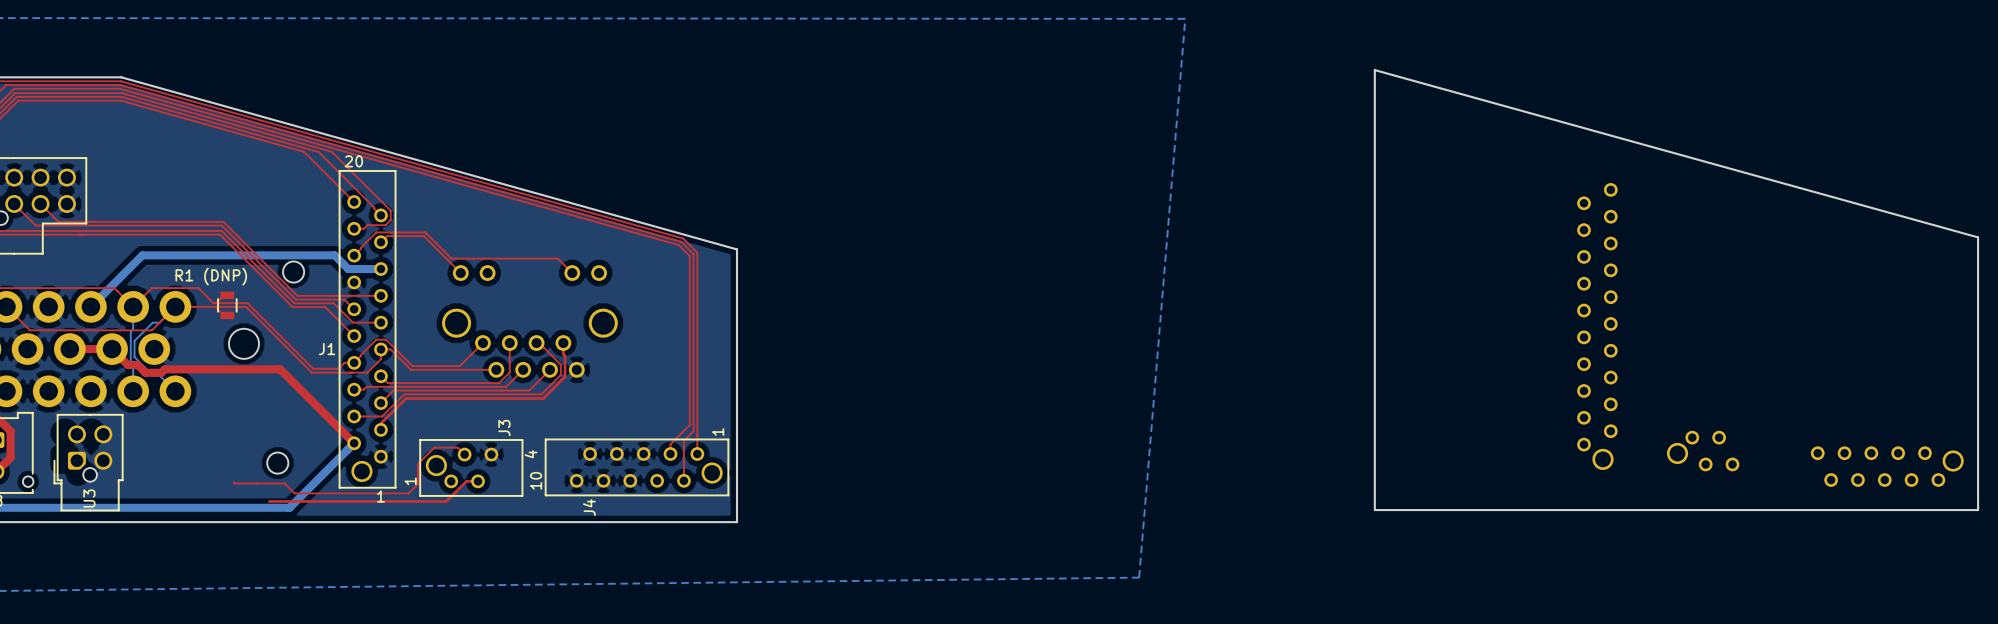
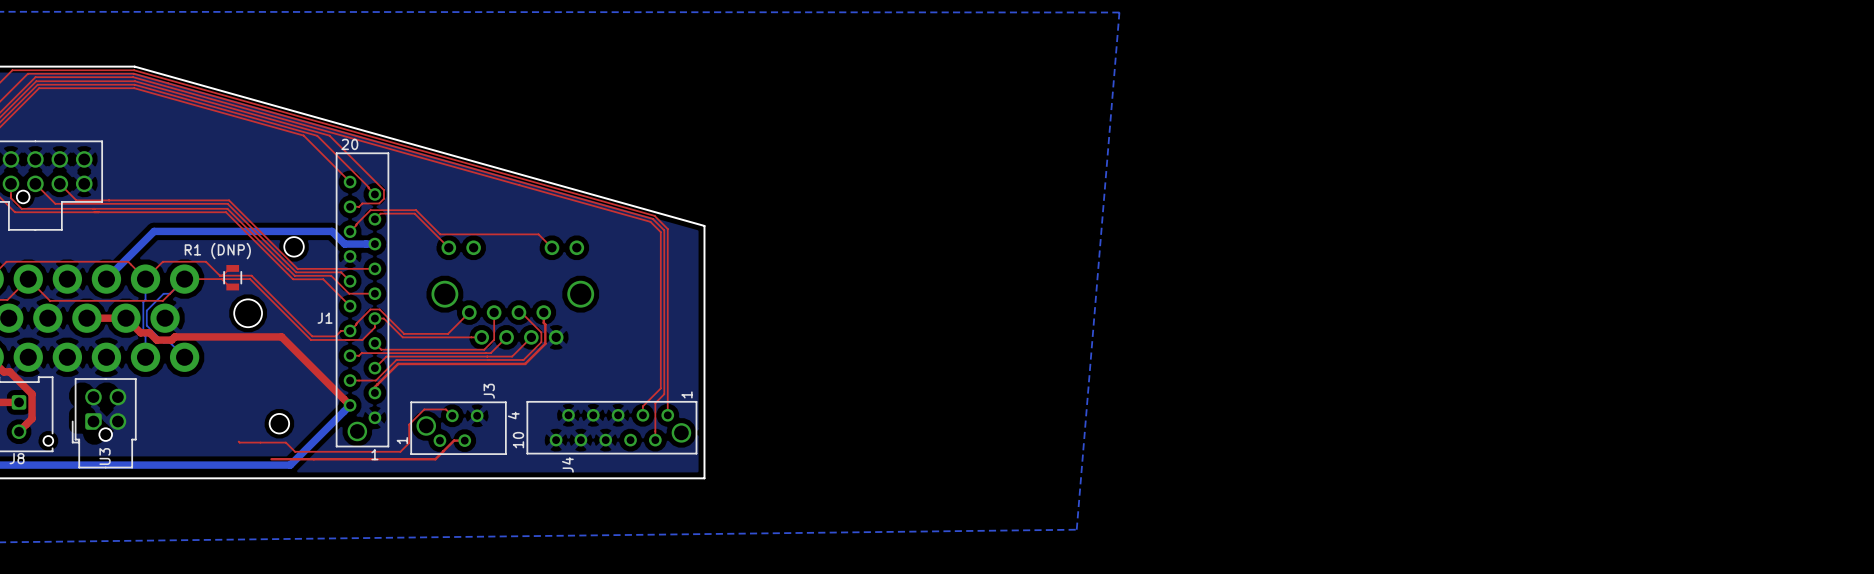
board edge: (1374, 70) (1374, 510) (1978, 510) (1978, 237) (1374, 70) -> none
part: (1597, 326) -> none
part: (1703, 451) -> none
part: (1887, 466) -> none

